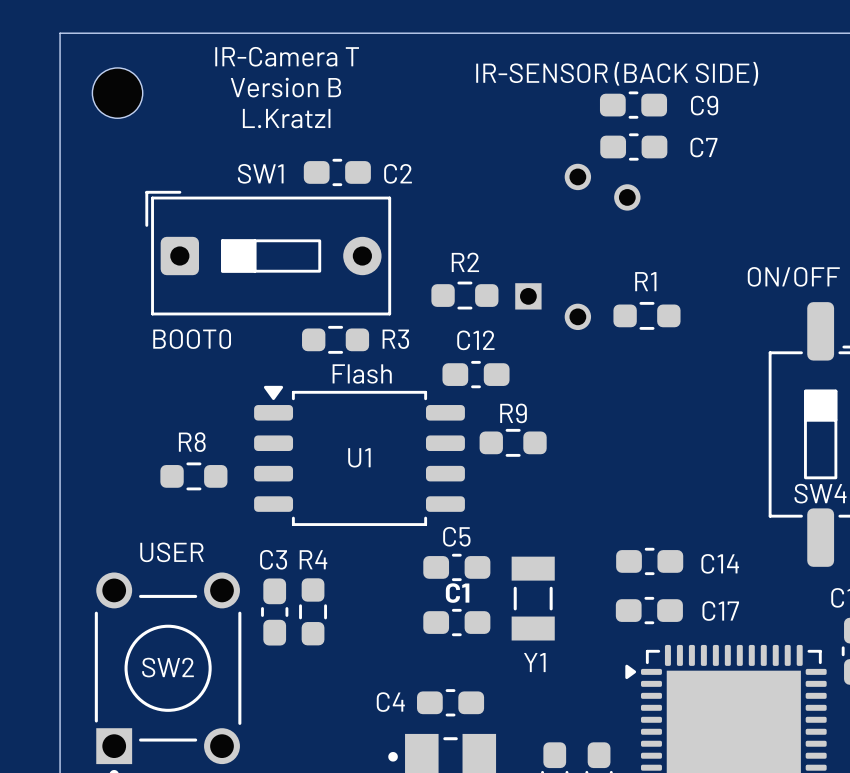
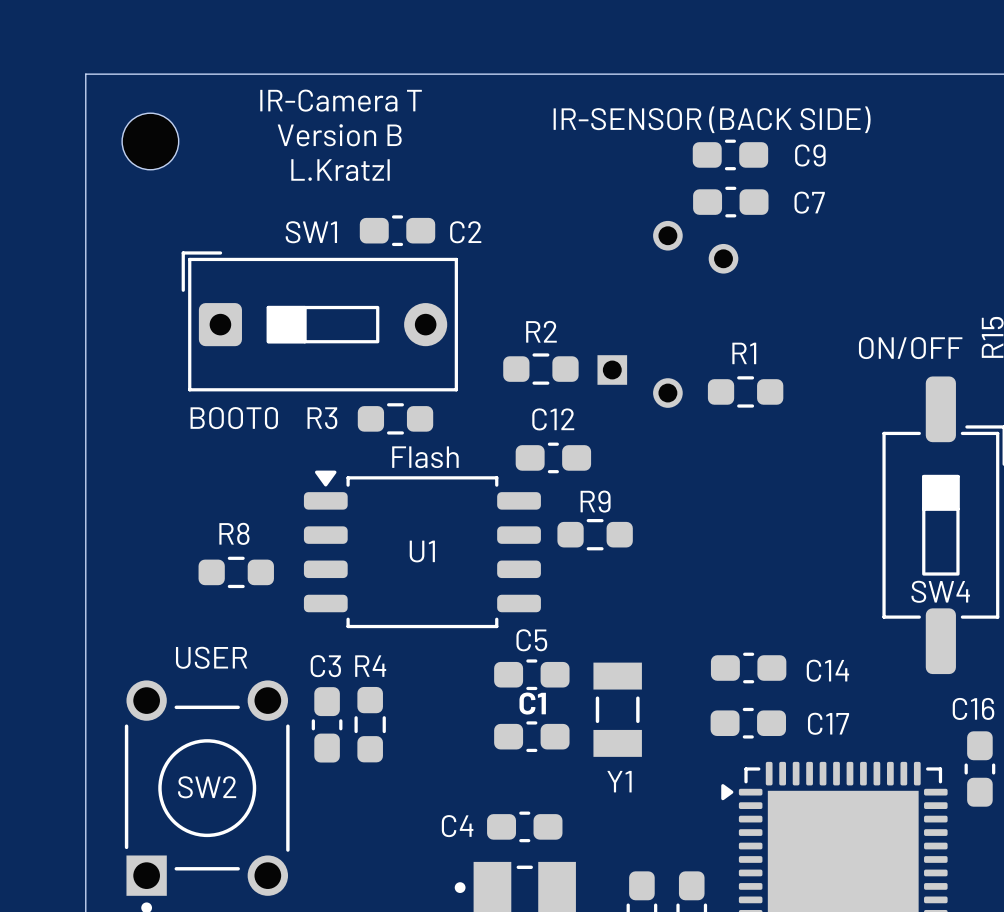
R3 name position: R3 (395, 339) -> R3 (322, 418)

